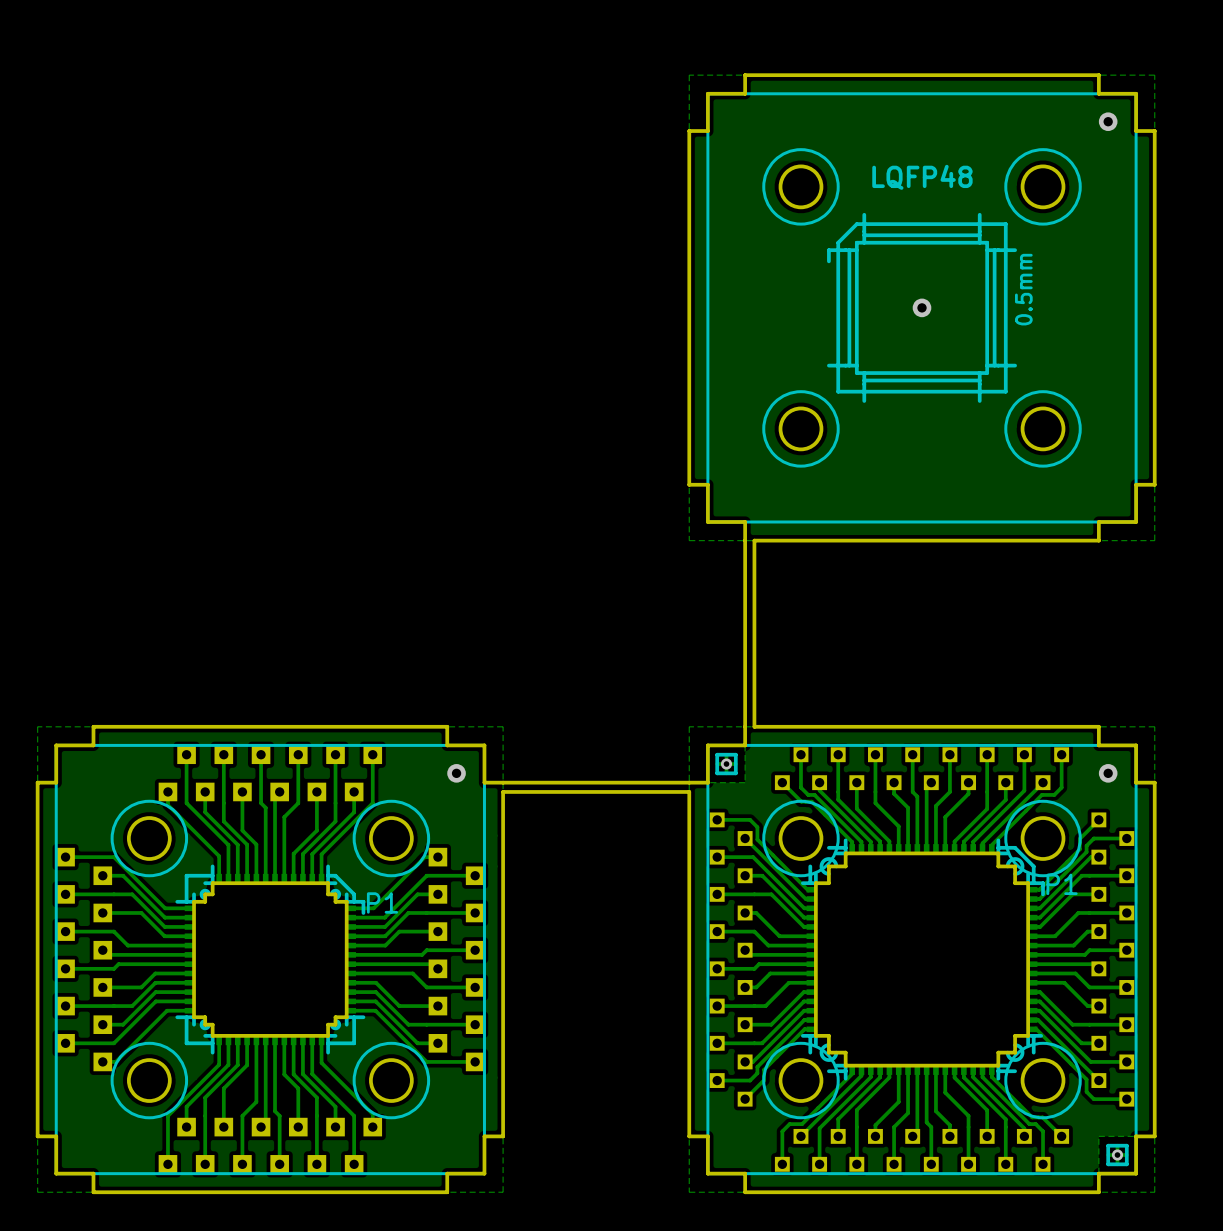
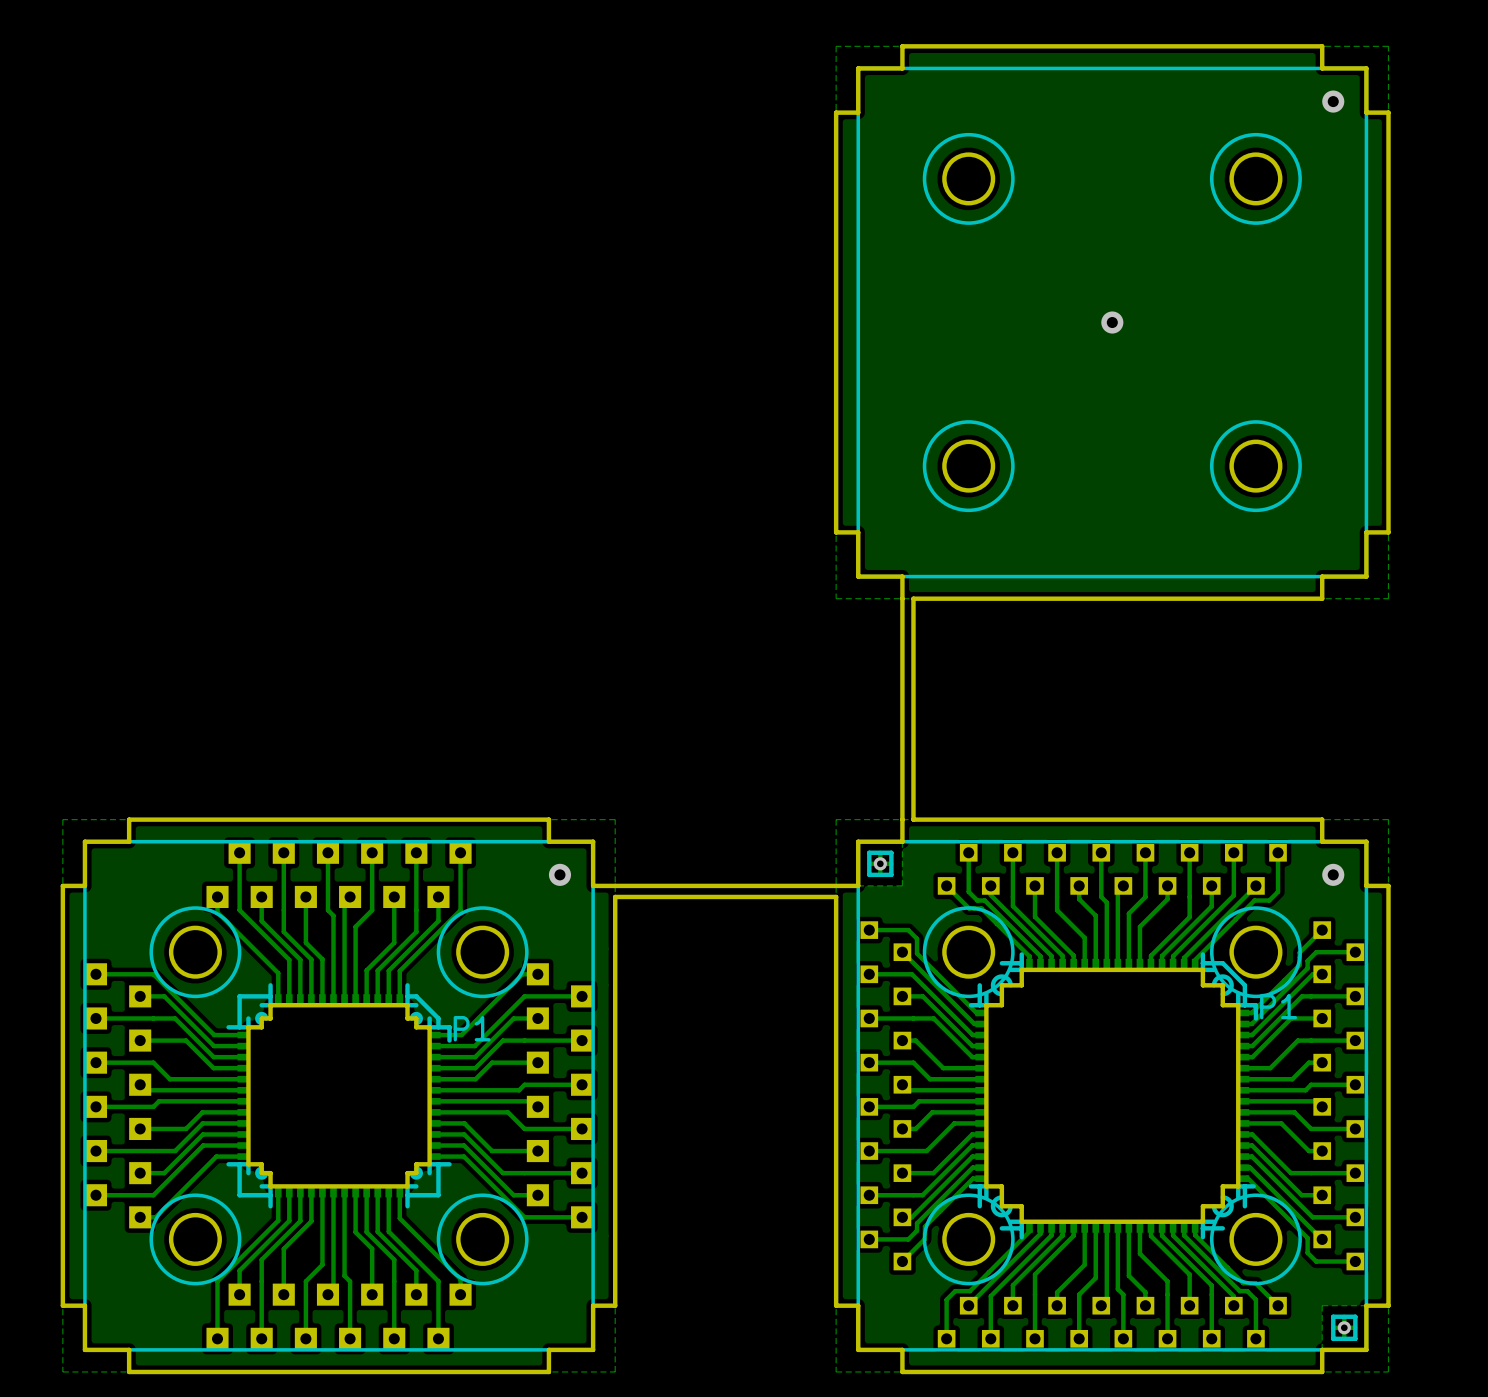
text: LQFP48 (922, 177) -> none
drawing: [827, 212, 1017, 403] -> none
text: 0.5mm (1023, 289) -> none

